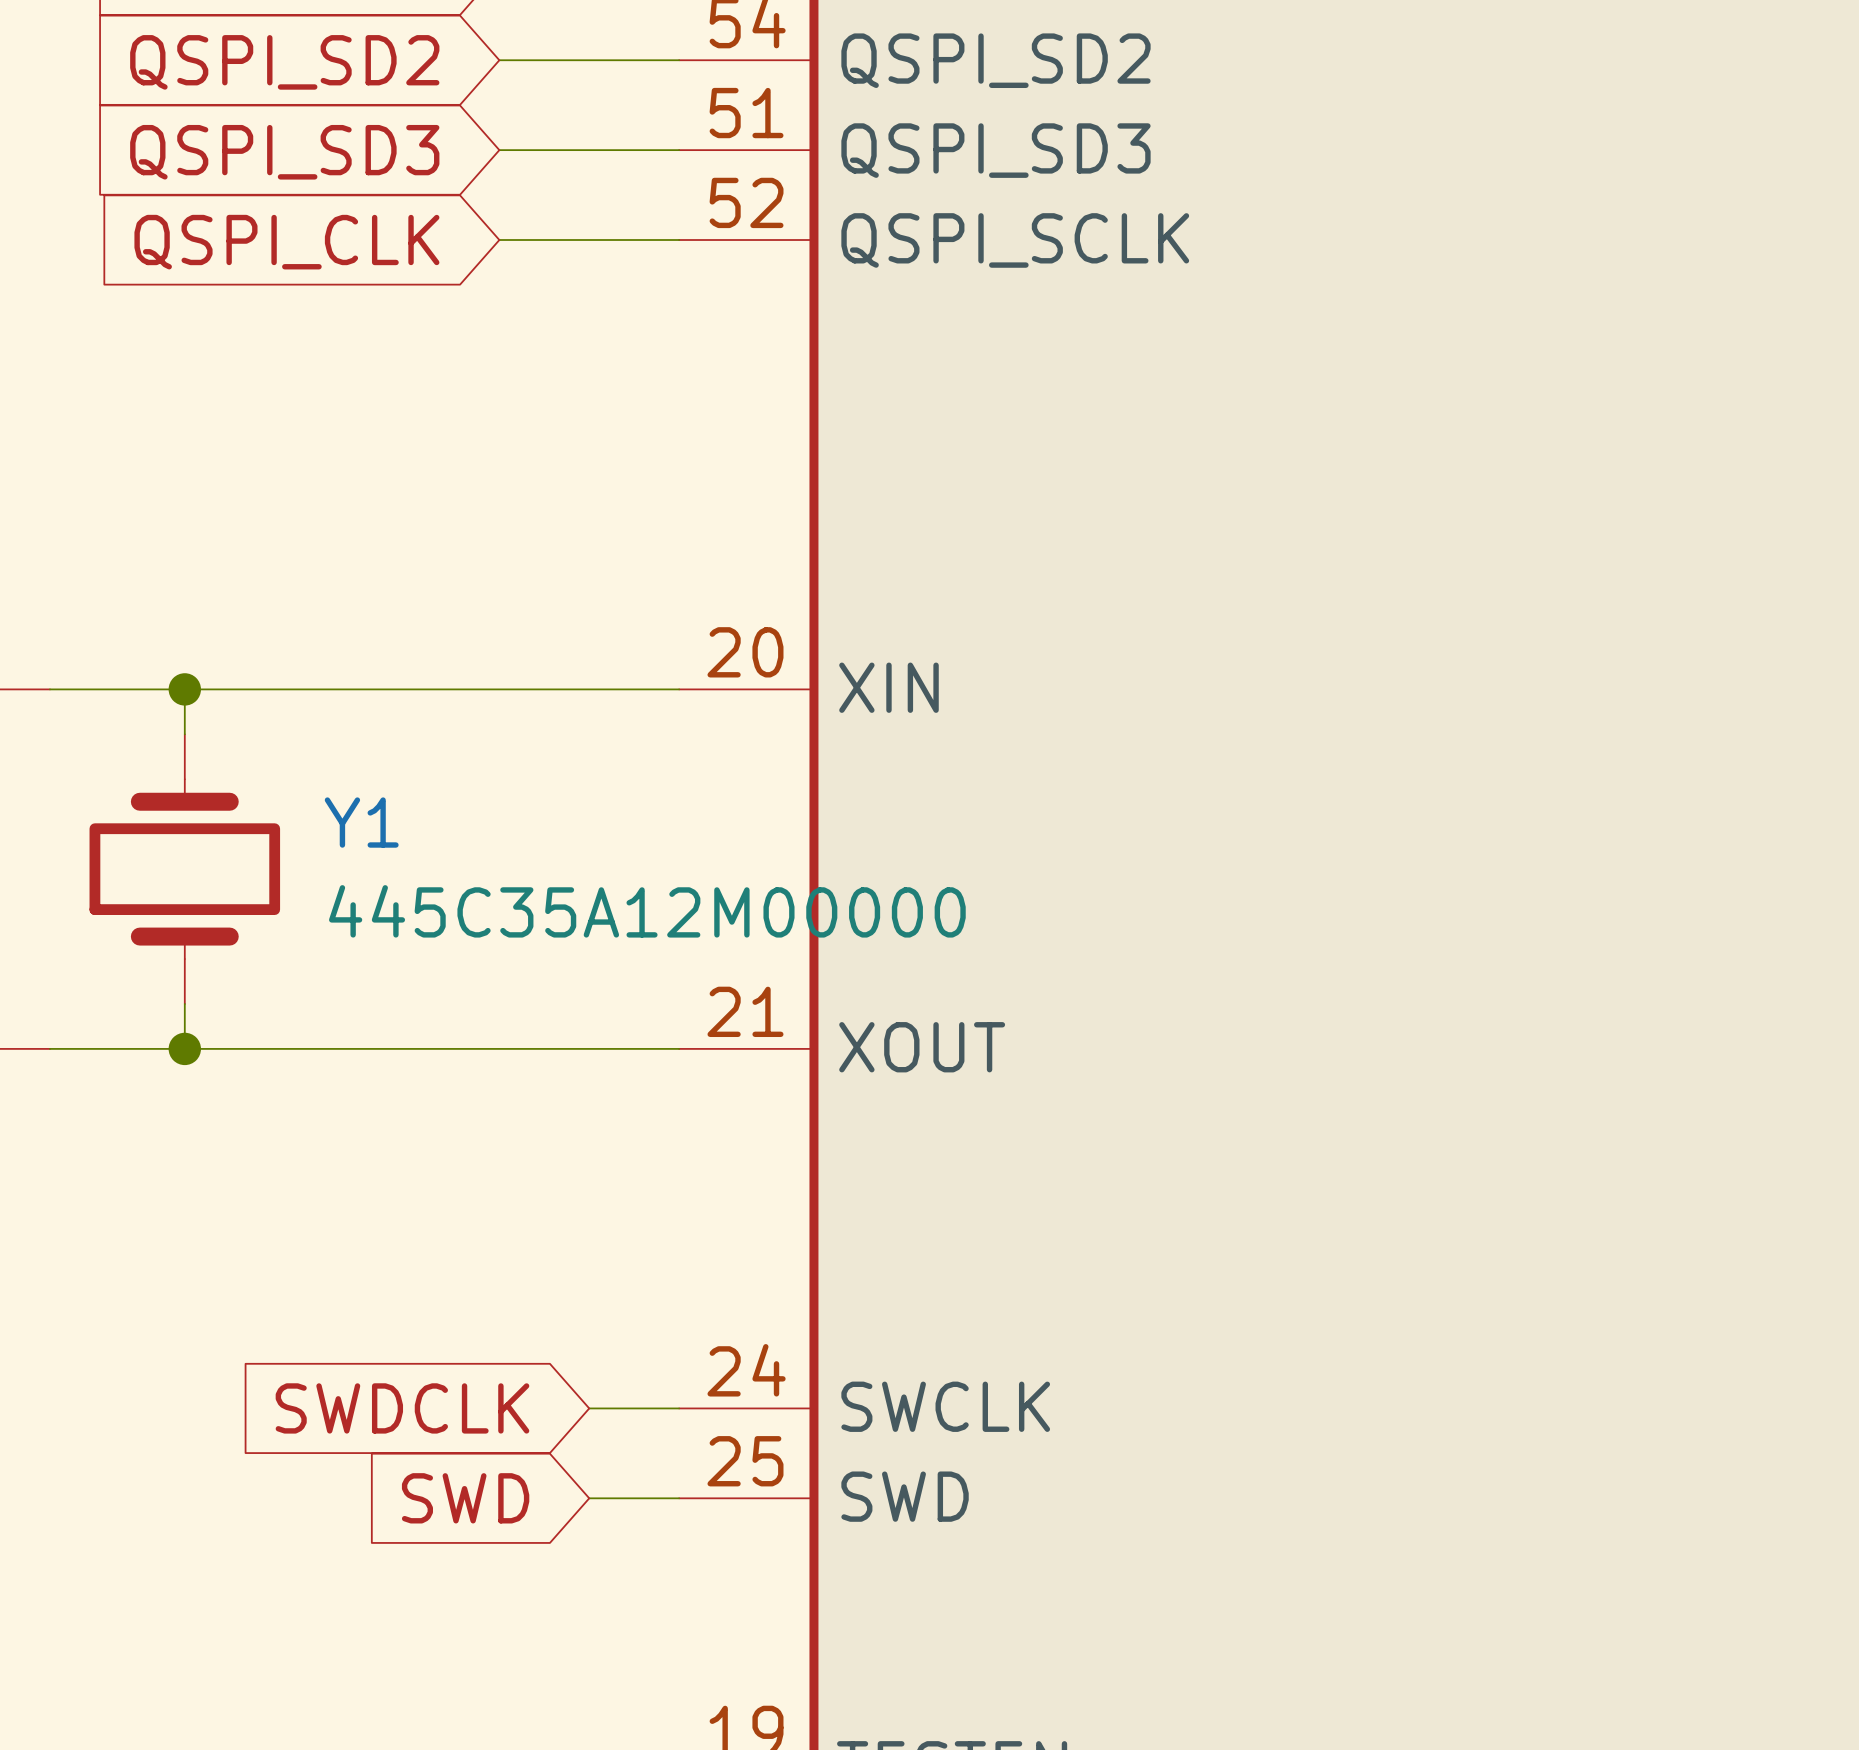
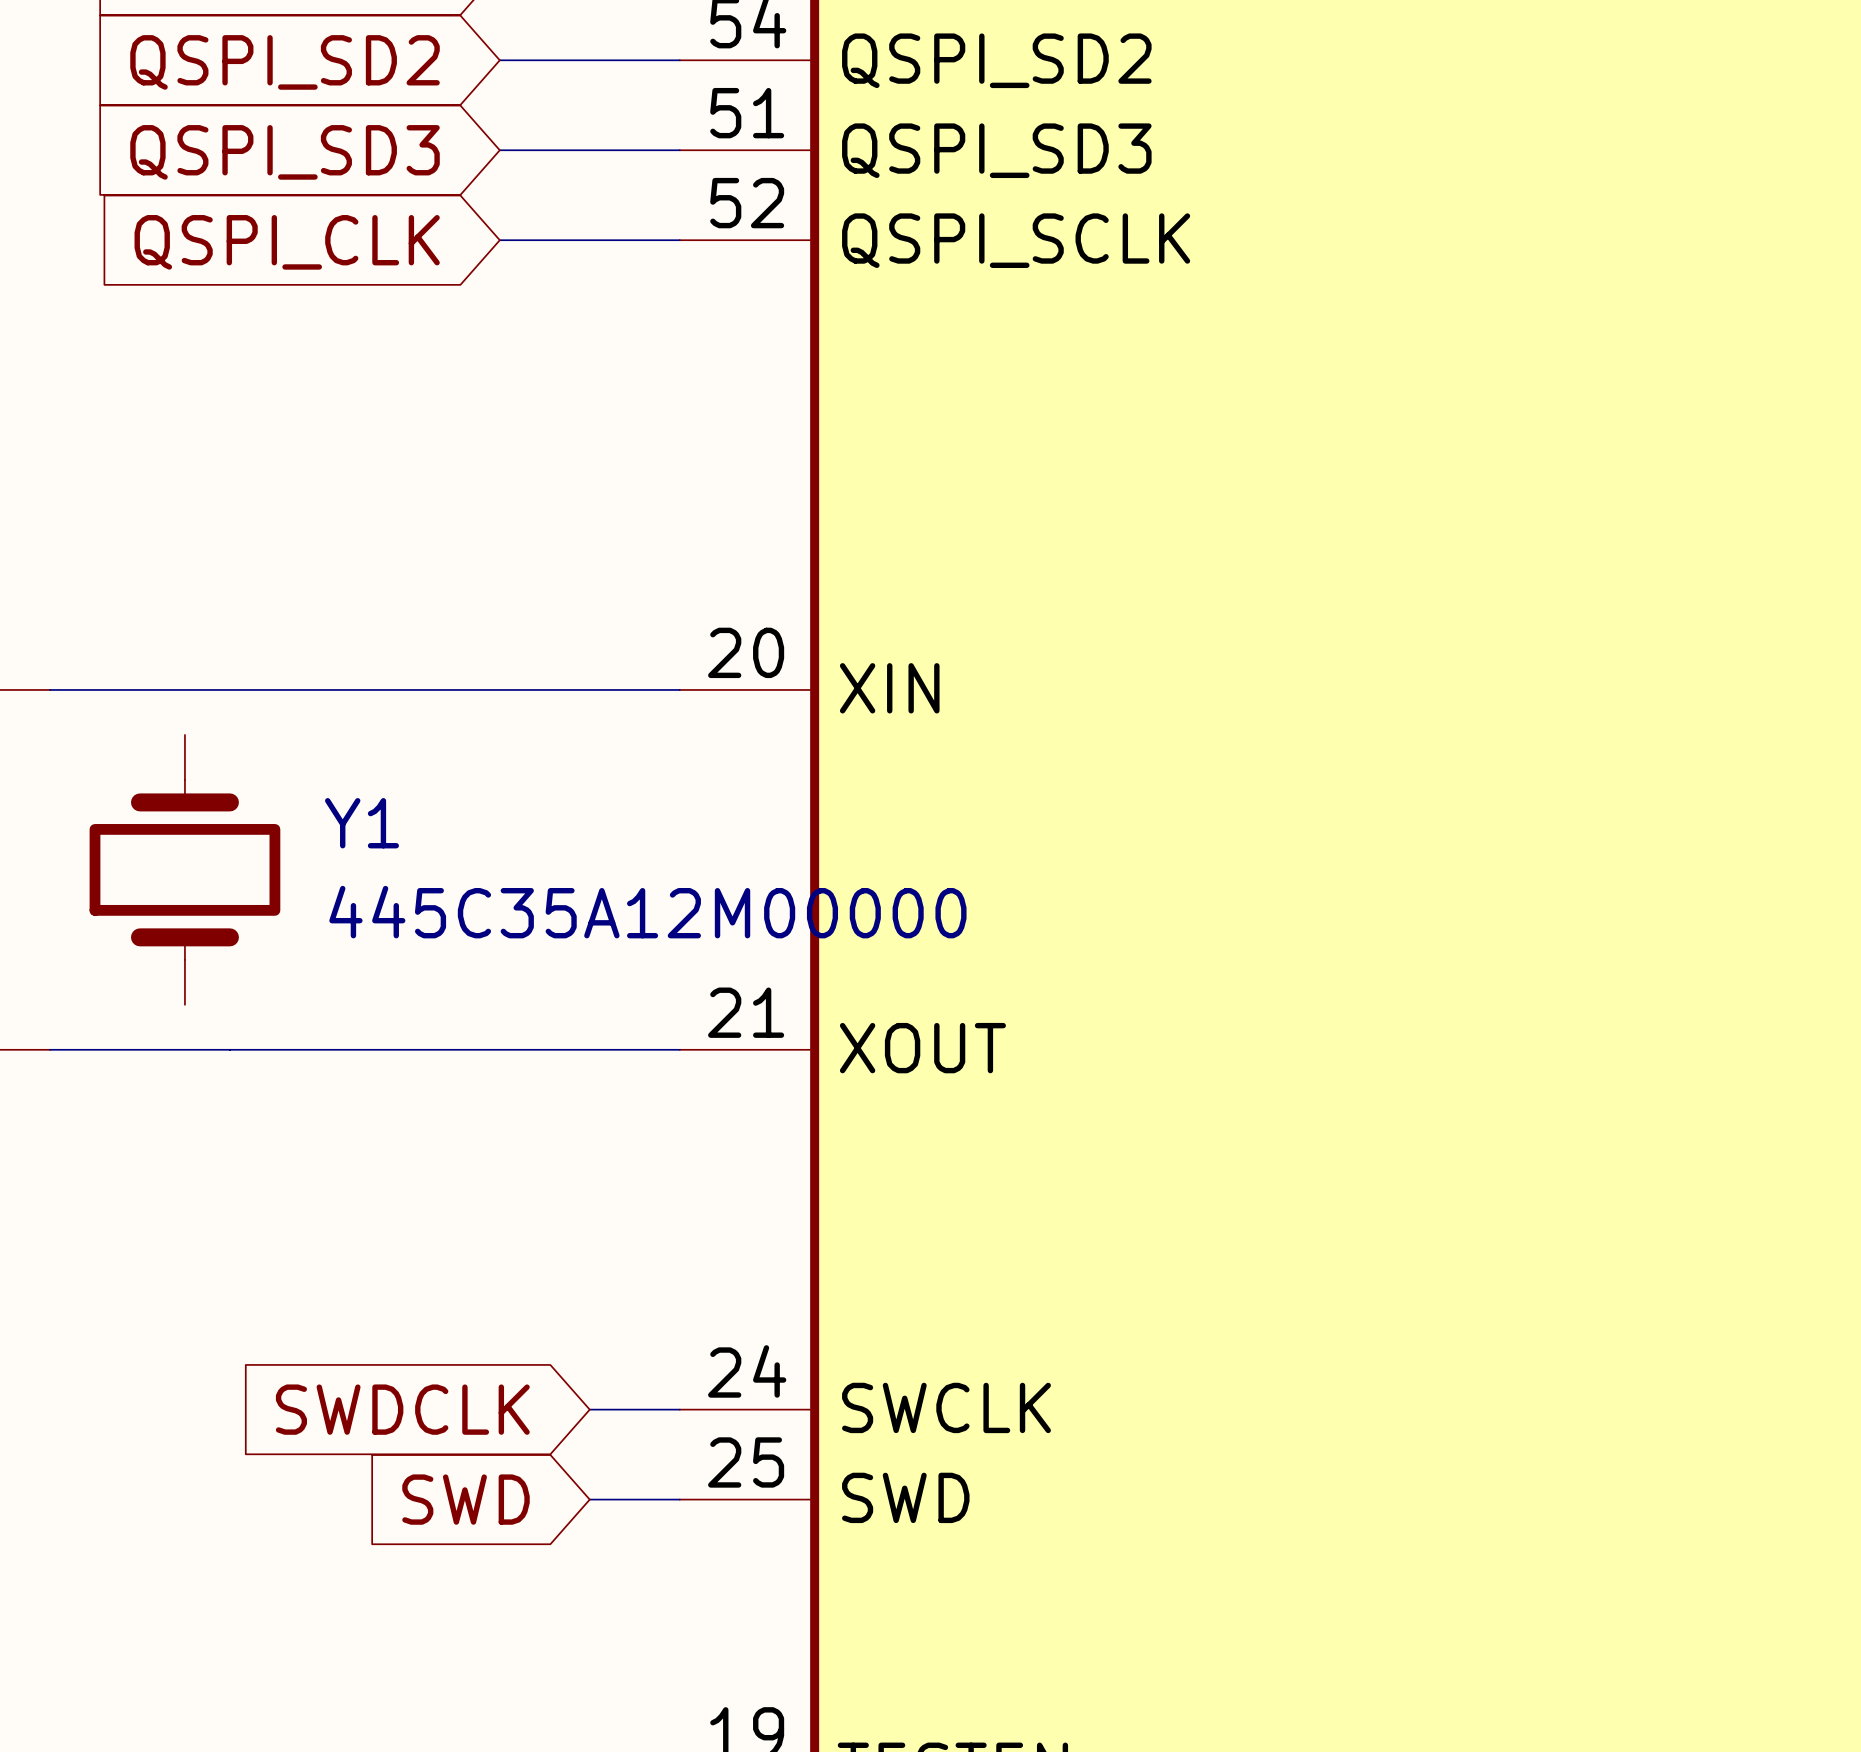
wire: (184, 689) (184, 734) -> none
junction: (184, 689) -> none
wire: (184, 1003) (184, 1048) -> none
junction: (184, 1048) -> none

